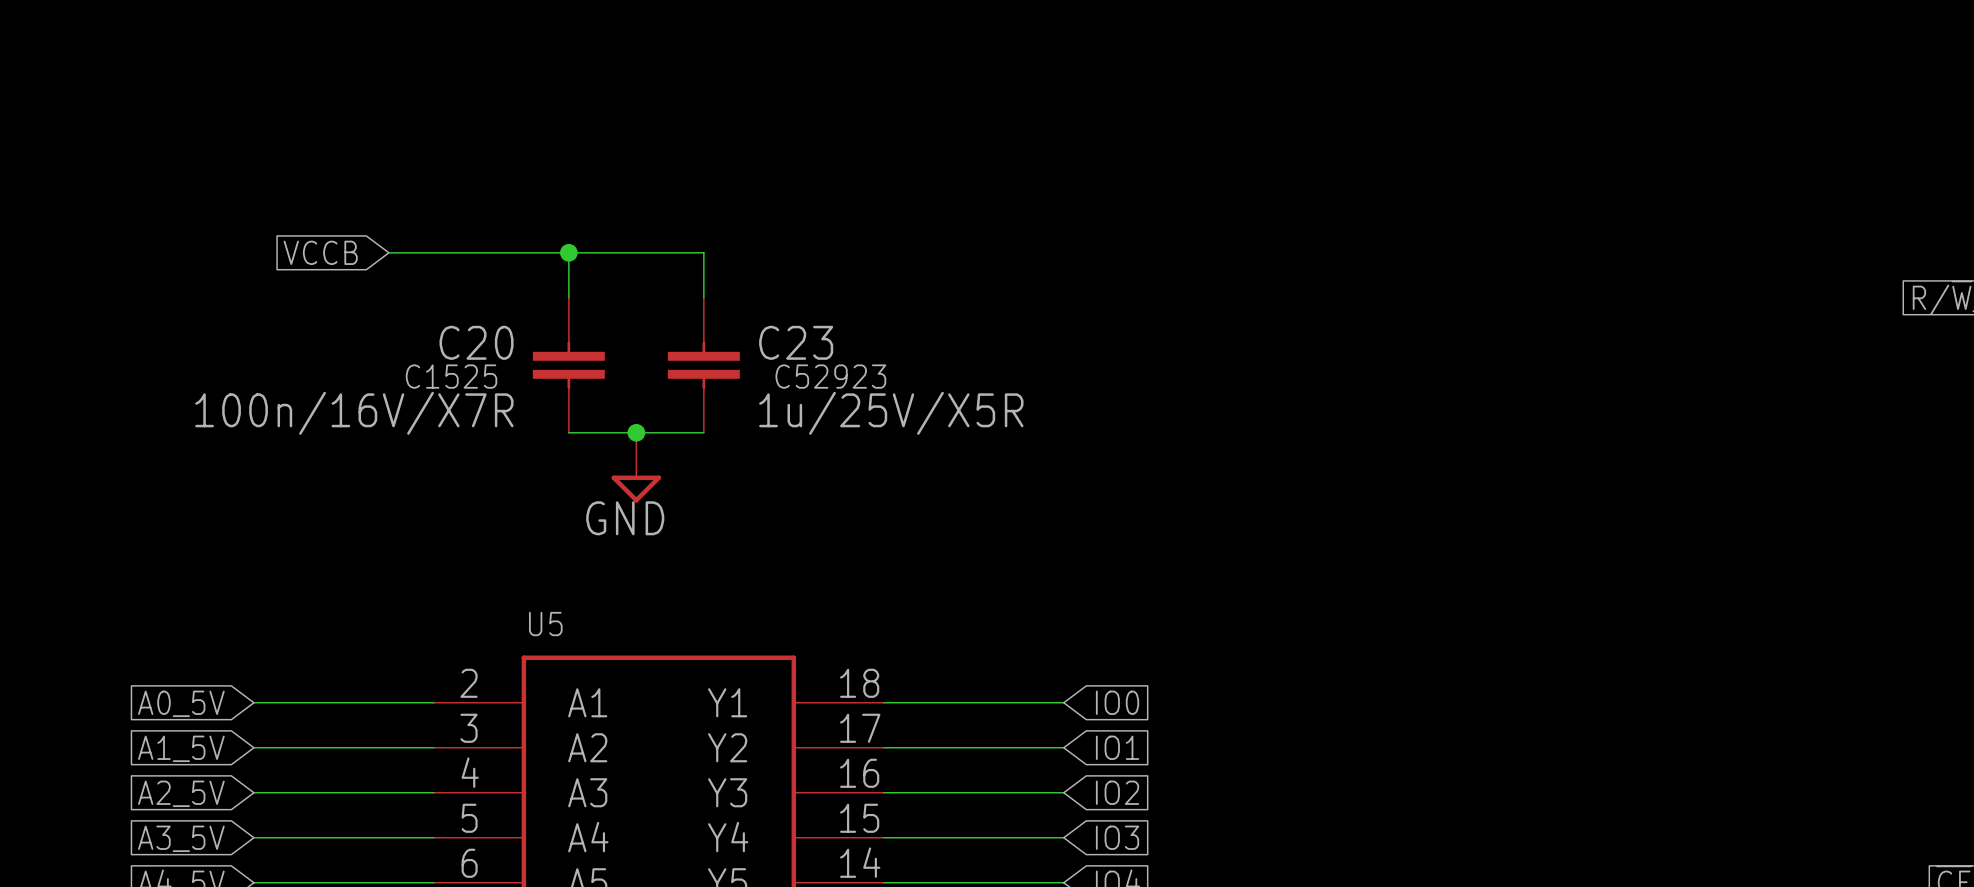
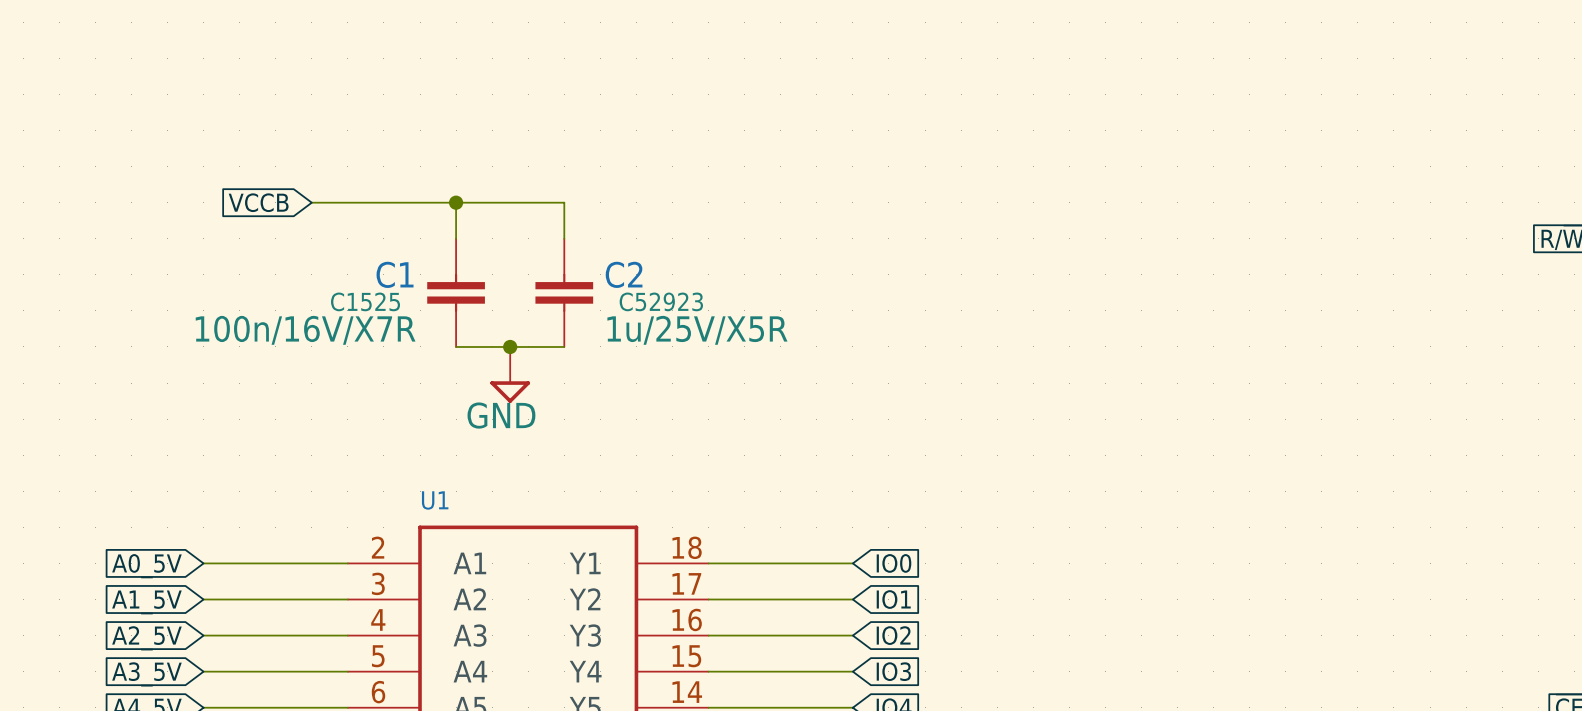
C20 name: C20 (476, 342) -> C1 (395, 274)
C23 name: C23 (796, 342) -> C2 (624, 274)
U5 name: U5 (545, 624) -> U1 (435, 500)

